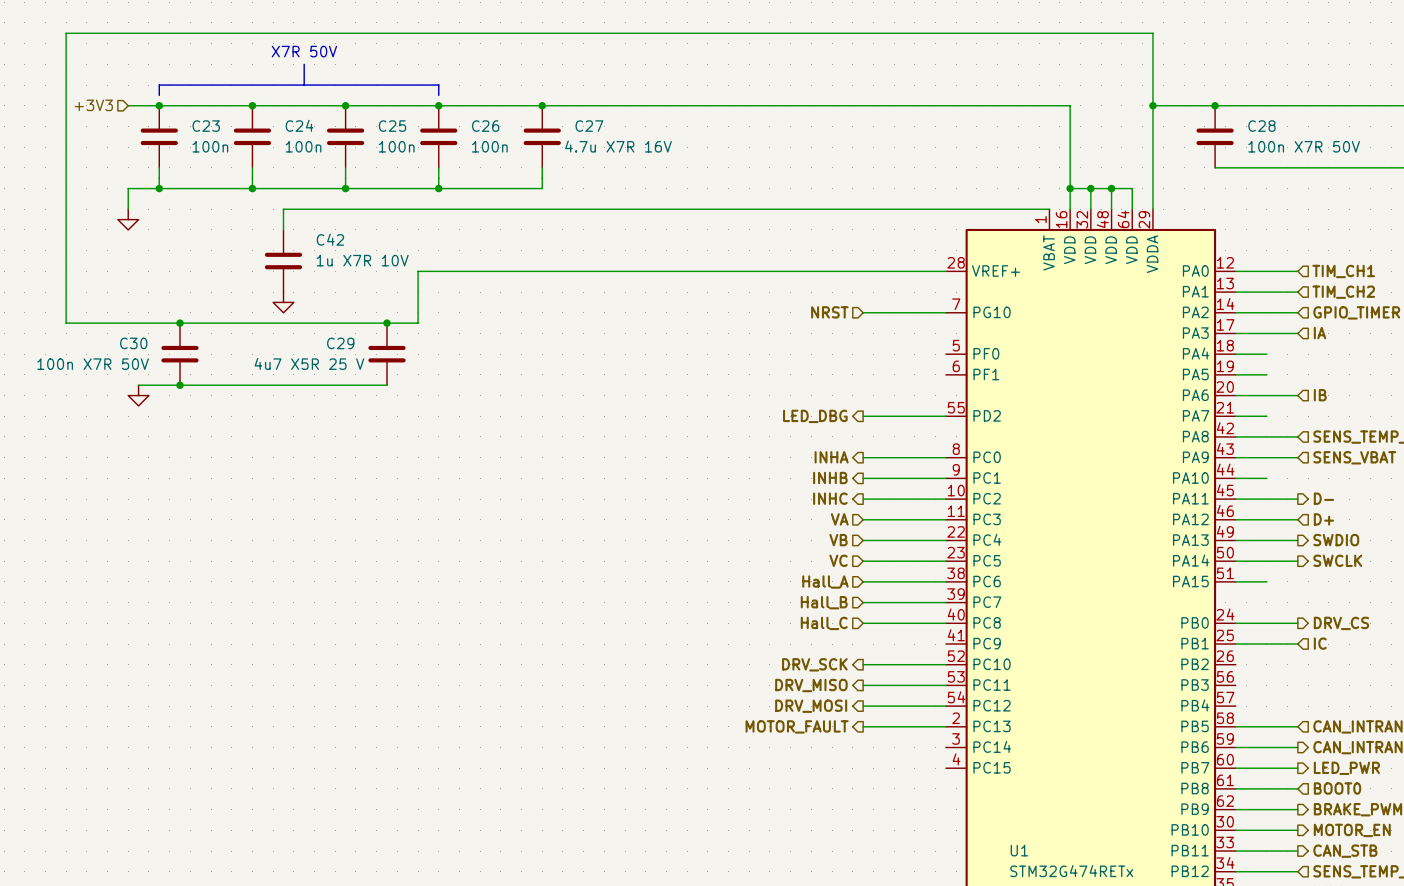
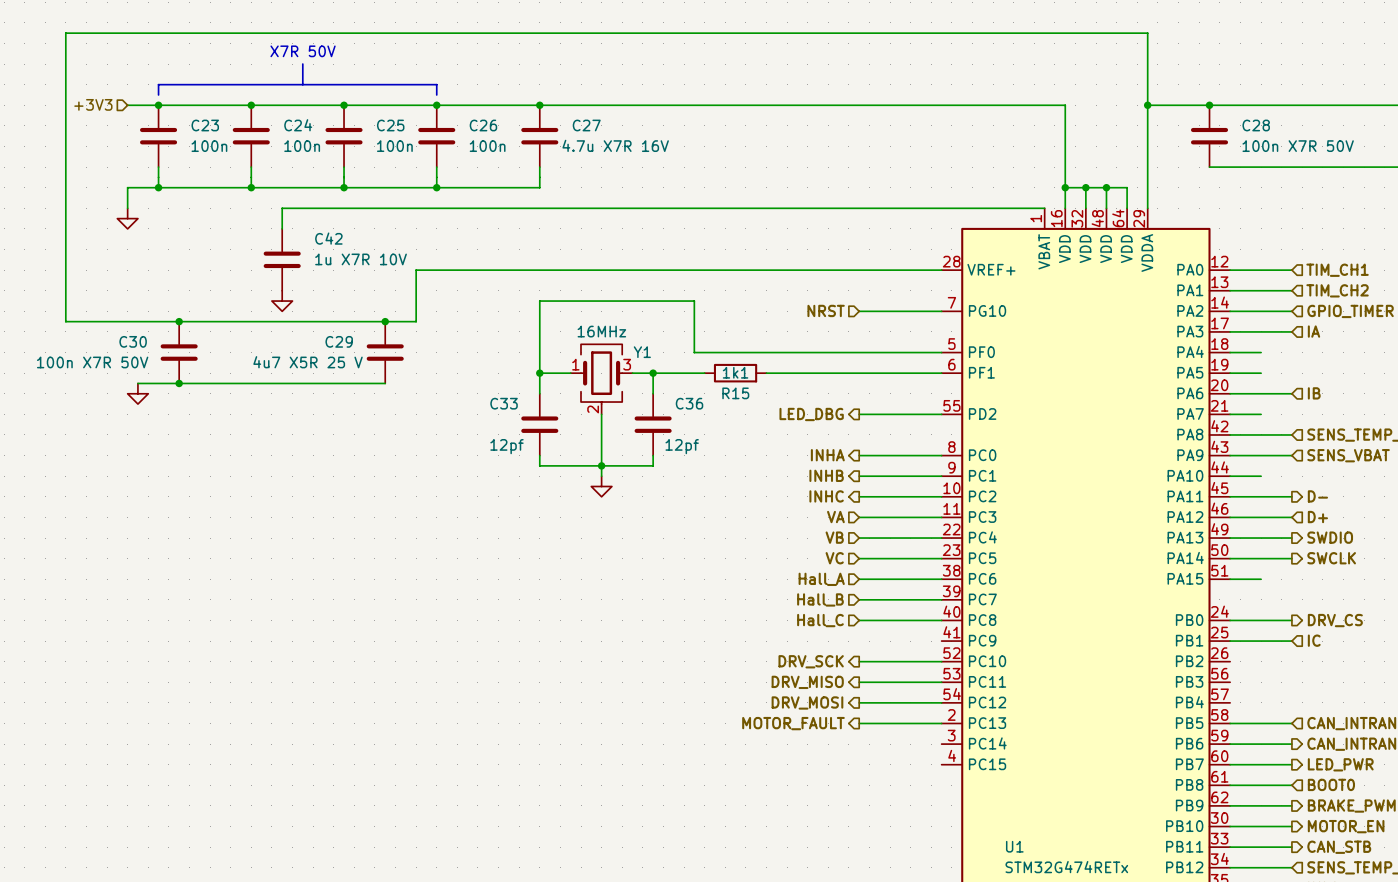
wire: none -> (941, 352) (694, 352) (694, 301) (539, 301) (539, 393)
wire: none -> (539, 373) (570, 373)
junction: none -> (539, 373)
wire: none -> (632, 373) (704, 373)
wire: none -> (653, 373) (653, 393)
junction: none -> (653, 373)
R15: none -> 1k1 (735, 373)
wire: none -> (766, 373) (941, 373)
Y1: none -> 16MHz (601, 379)
wire: none -> (601, 414) (601, 476)
C33: none -> 12pf (539, 424)
C36: none -> 12pf (653, 424)
wire: none -> (539, 455) (539, 465) (653, 465) (653, 455)
junction: none -> (601, 465)
power symbol: none -> (601, 486)

